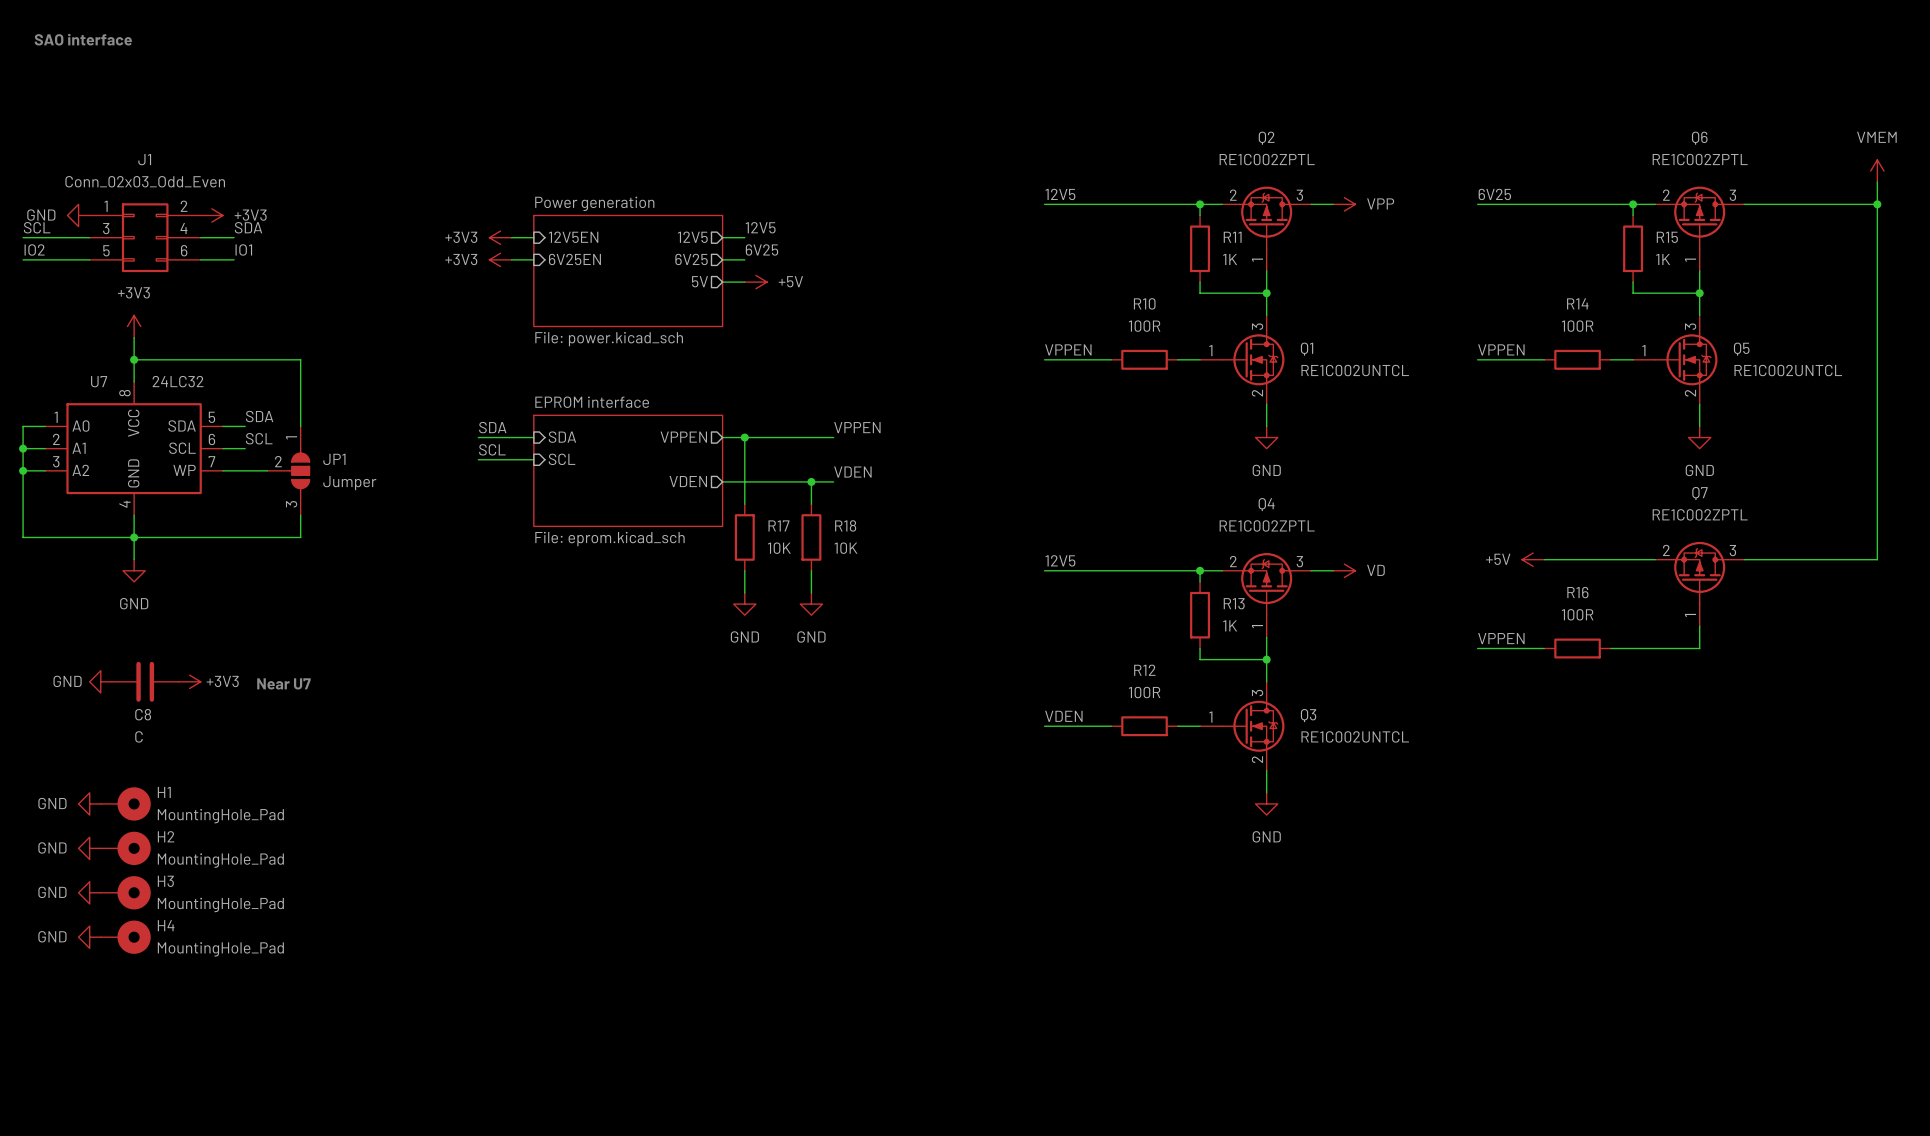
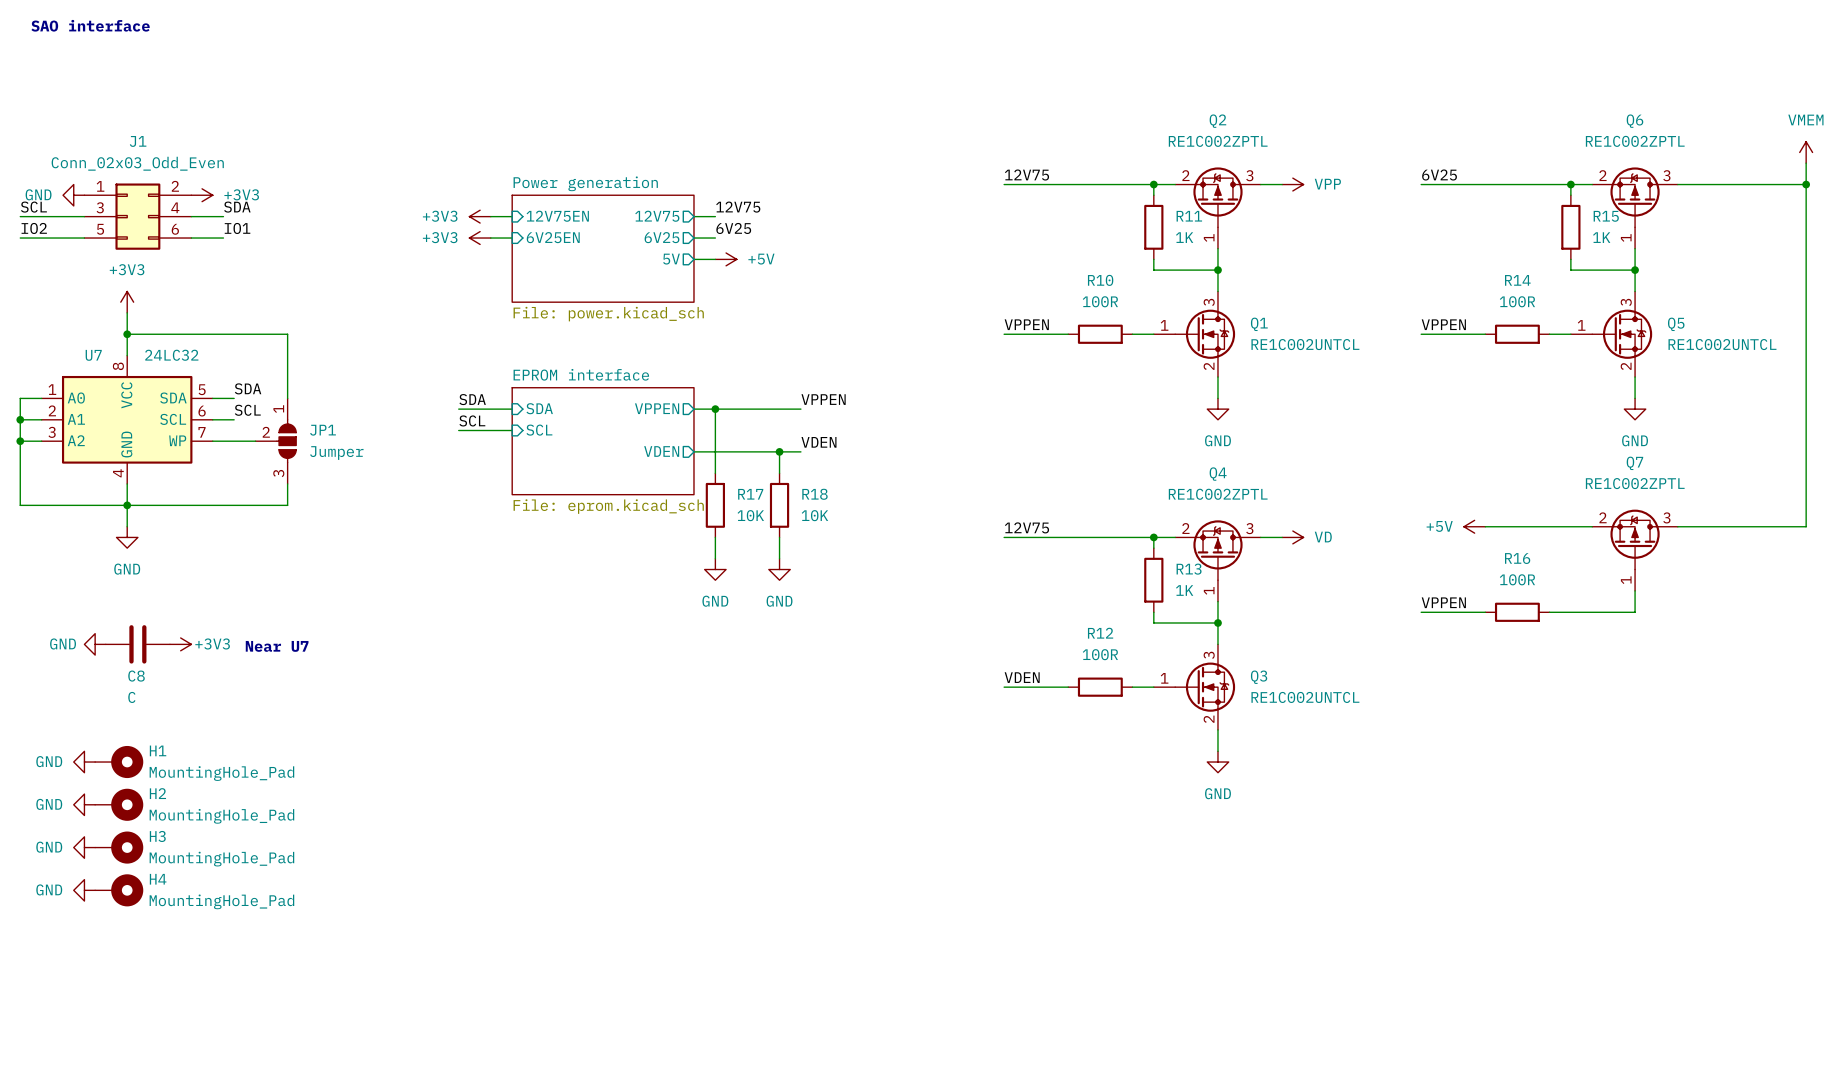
label: 12V5 (1060, 194) -> 12V75 (1026, 175)
label: 12V5 (760, 227) -> 12V75 (738, 207)
sheet pin: 12V5EN (573, 237) -> 12V75EN (557, 216)
sheet pin: 12V5 (692, 237) -> 12V75 (657, 216)
label: 12V5 (1060, 560) -> 12V75 (1026, 527)

